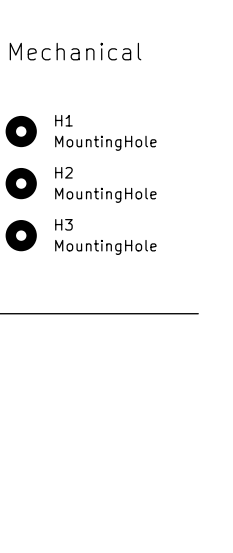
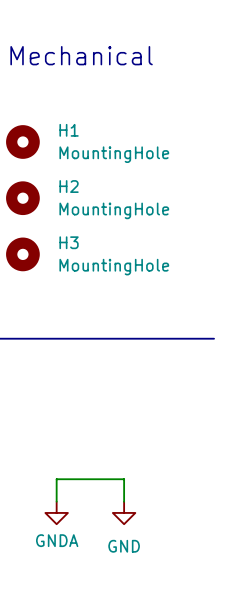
wire: none -> (56, 501) (56, 479) (124, 479) (124, 501)
power symbol: none -> GNDA (56, 512)
power symbol: none -> GND (124, 512)

